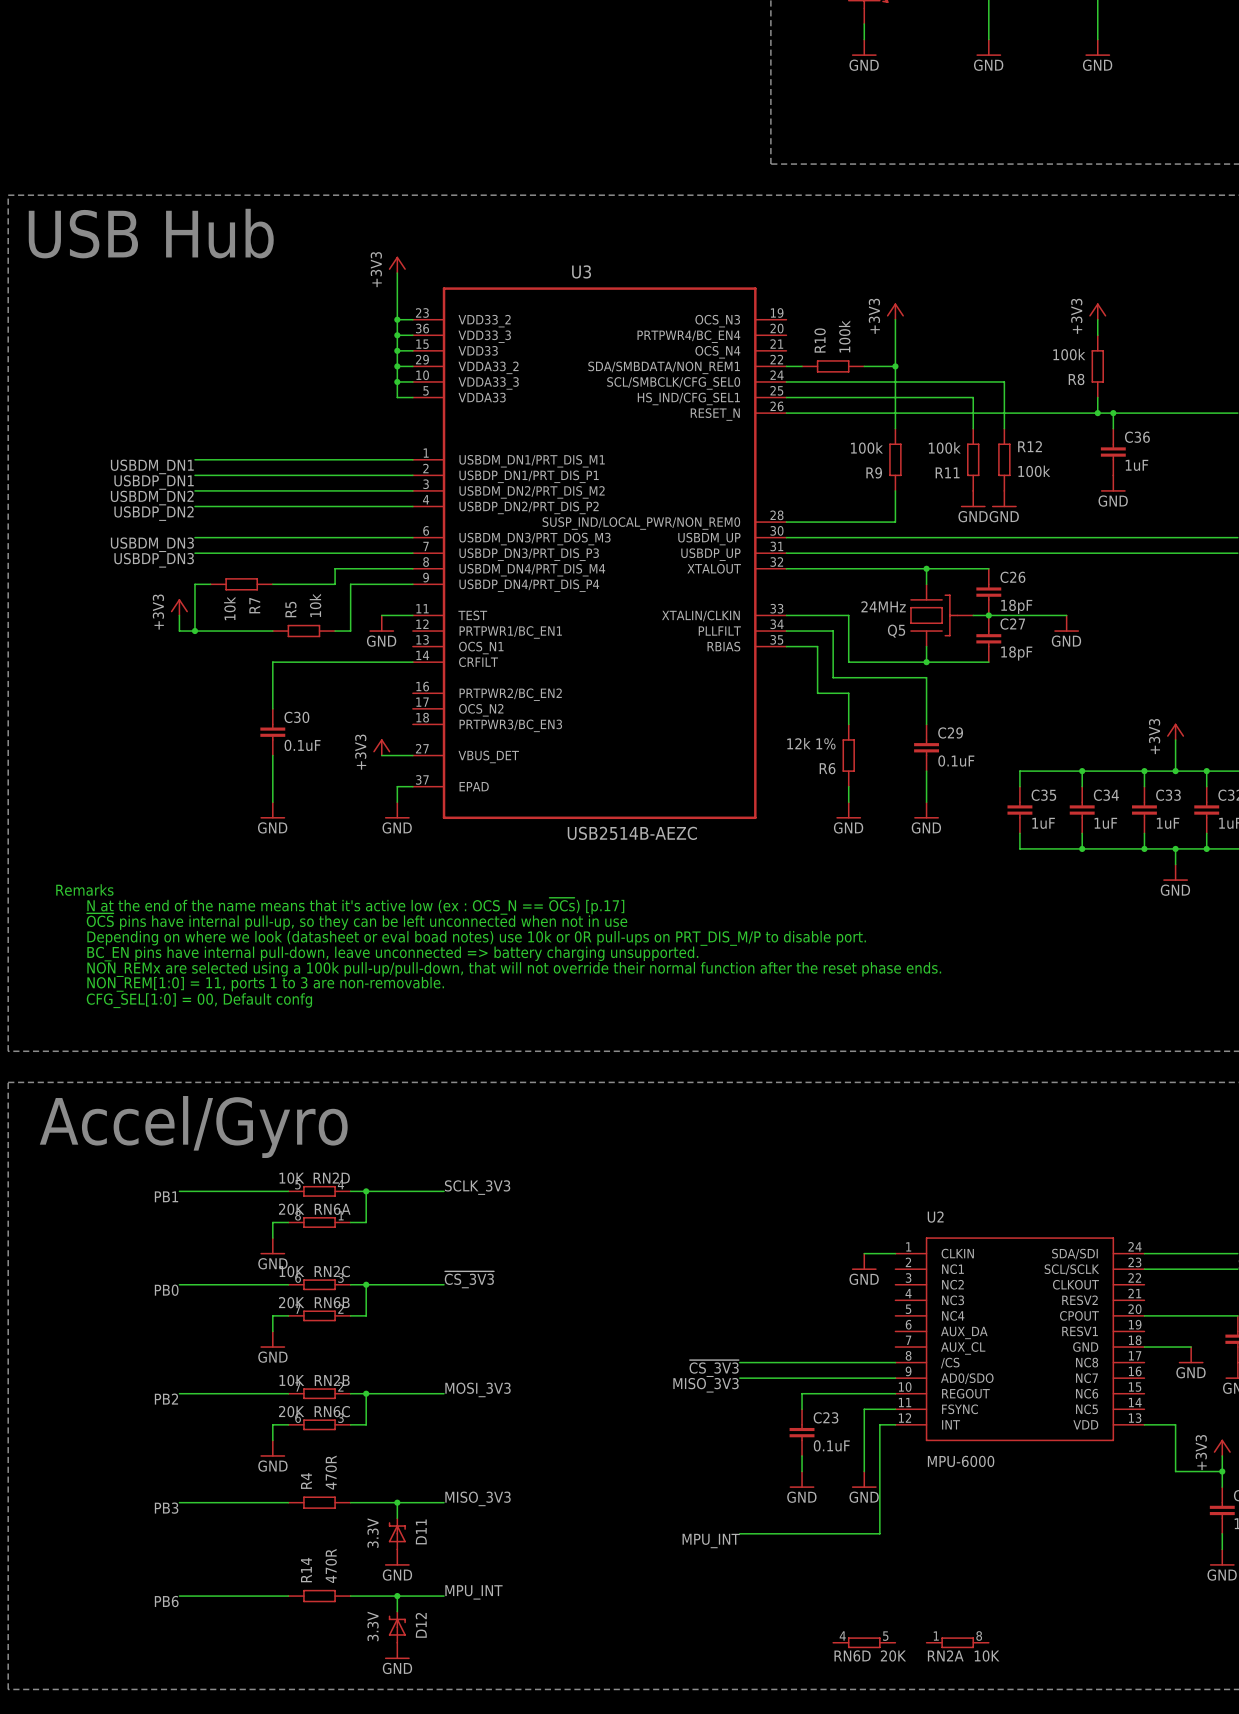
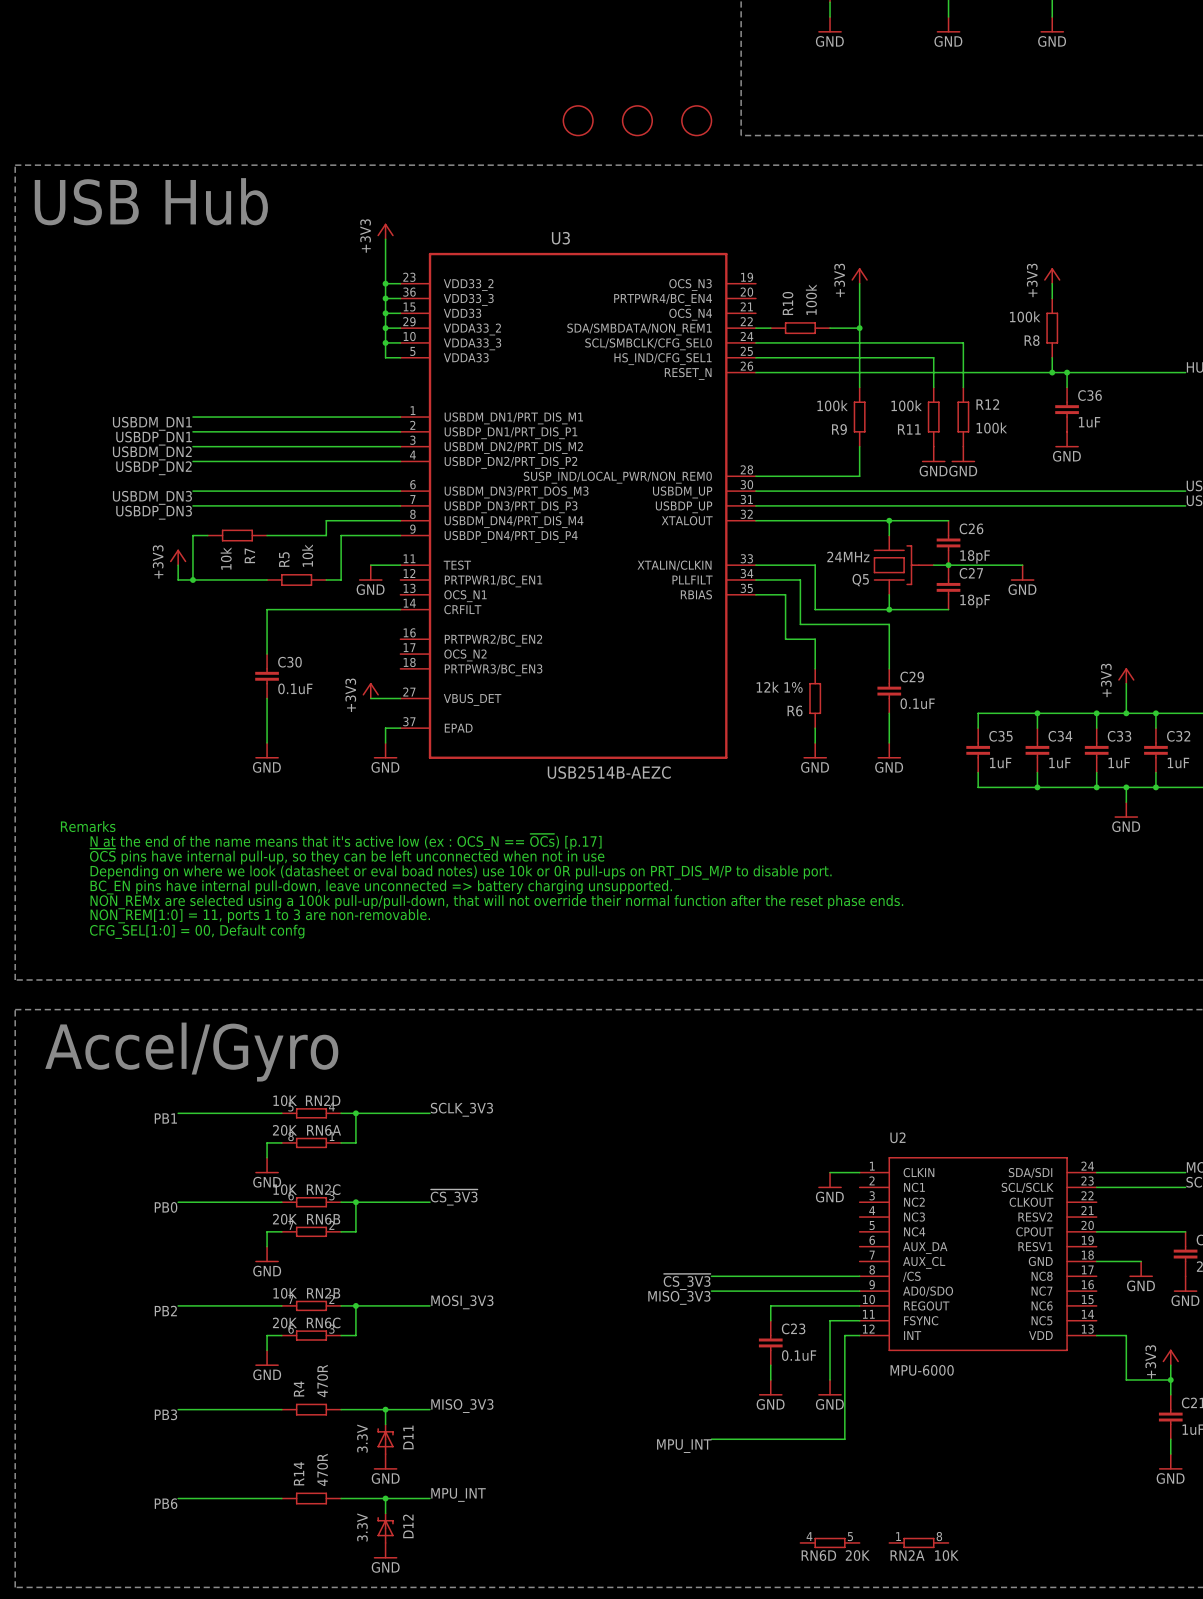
part: none -> (578, 120)
part: none -> (637, 120)
part: none -> (696, 120)

